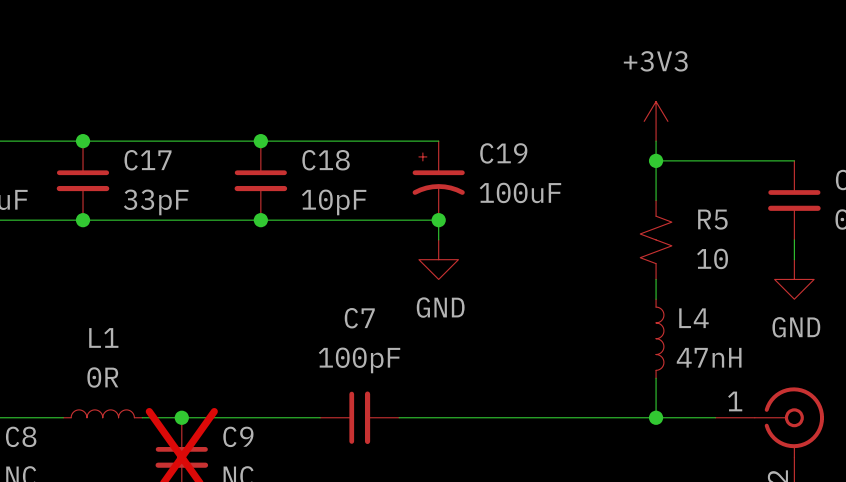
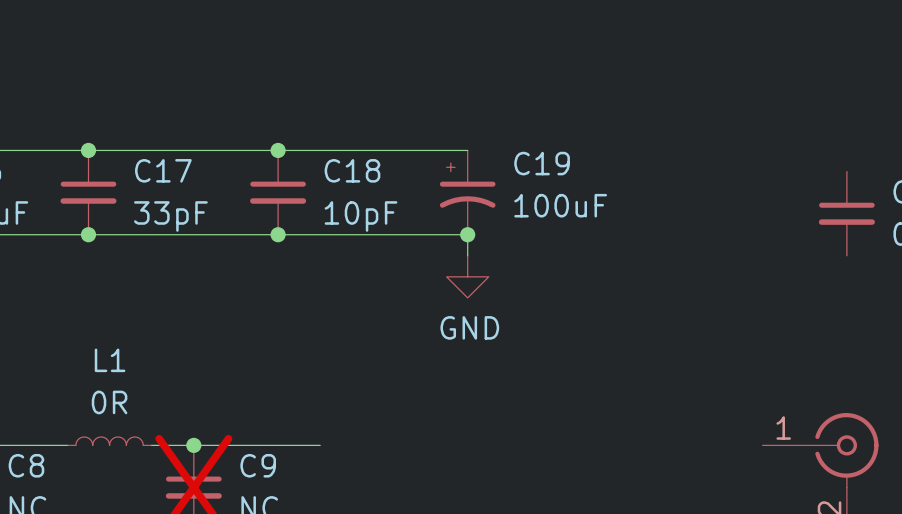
power symbol: +3V3 (656, 121) -> none
wire: (656, 141) (656, 200) -> none
wire: (656, 160) (794, 160) -> none
junction: (656, 160) -> none
R5: 10 (656, 239) -> none
wire: (794, 239) (794, 259) -> none
wire: (656, 279) (656, 299) -> none
power symbol: GND (794, 279) -> none
L4: 47nH (659, 338) -> none
wire: (656, 378) (656, 417) -> none
wire: (300, 417) (320, 417) -> none
C7: 100pF (359, 417) -> none
wire: (399, 417) (715, 417) -> none
junction: (656, 417) -> none

